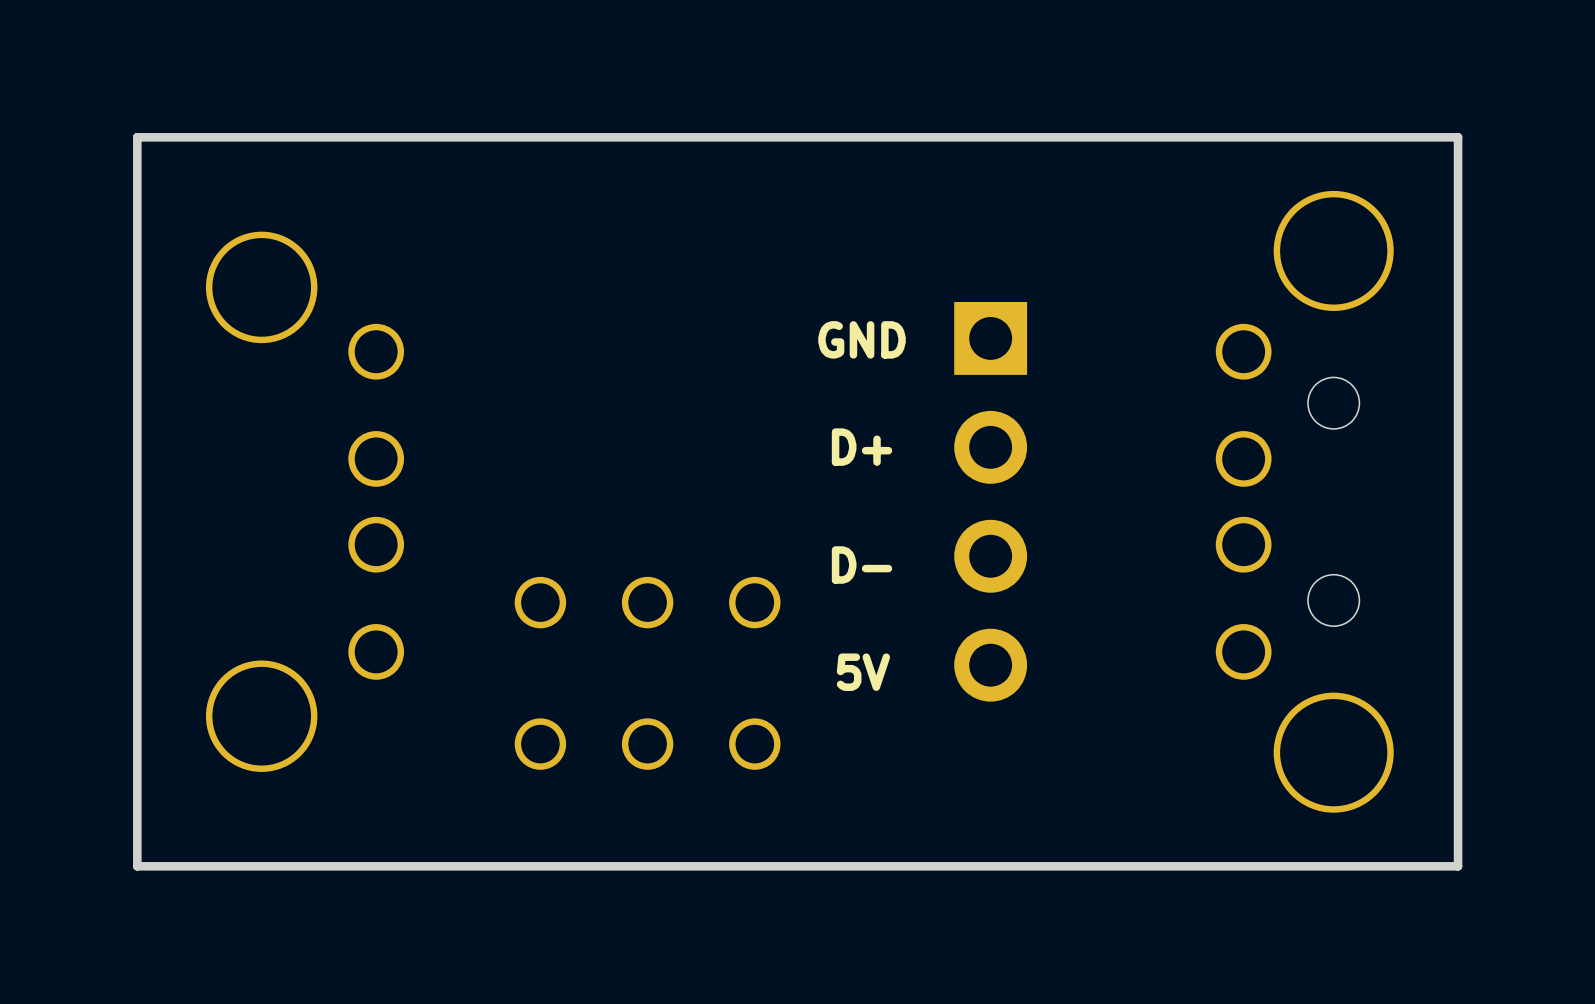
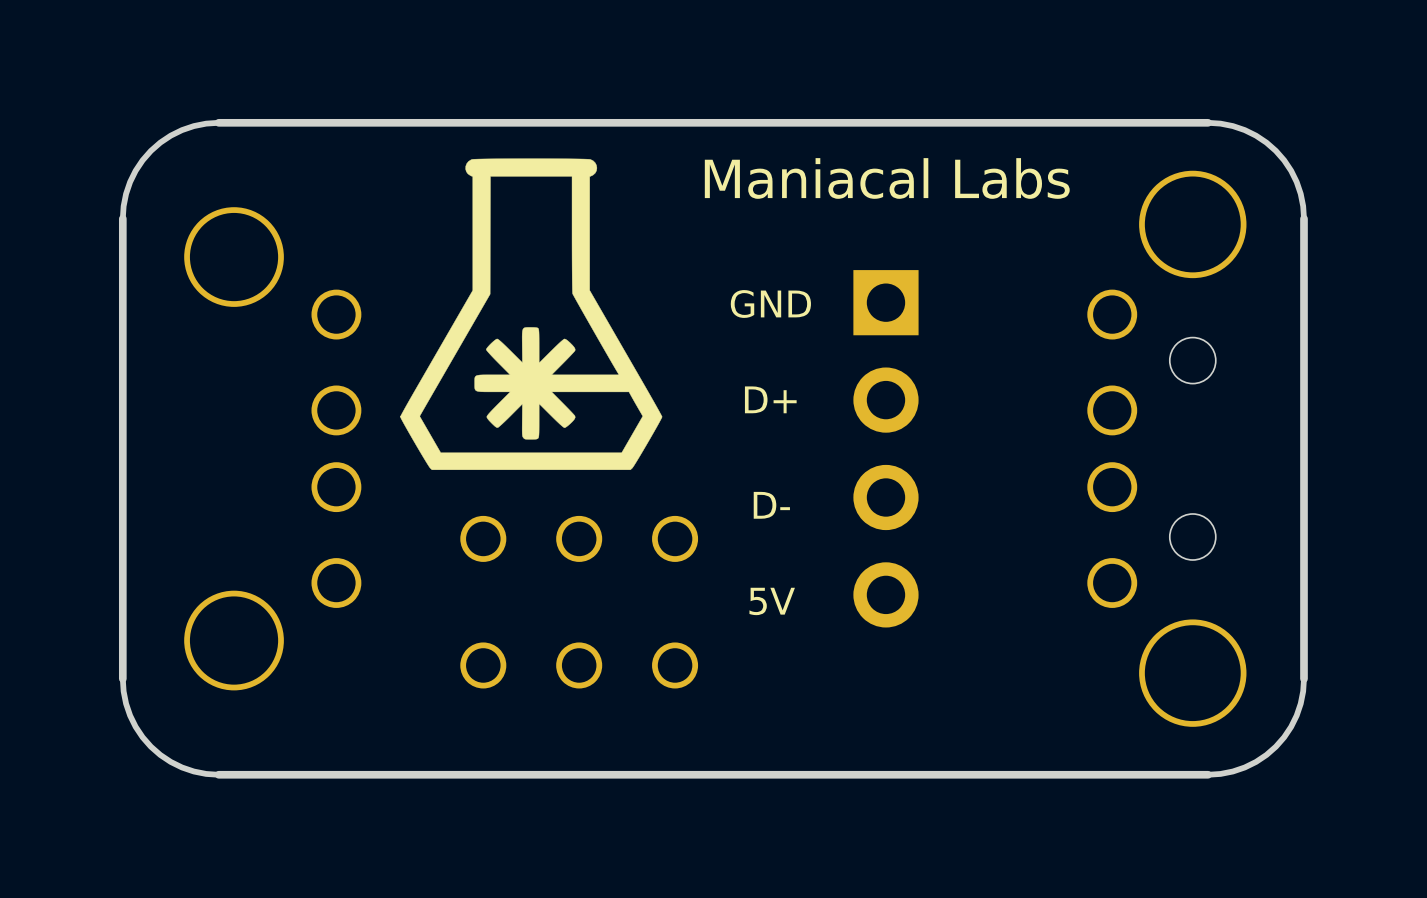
board edge: (244, 137) (137, 137) (137, 244) -> (218, 122) (206, 123) (182, 130) (160, 142) (150, 150) (142, 160) (130, 182) (123, 206) (122, 218)
board edge: (1350, 137) (1458, 137) (1458, 244) -> (1208, 122) (1220, 123) (1244, 130) (1266, 142) (1275, 150) (1284, 160) (1296, 182) (1303, 206) (1303, 218)
drawing: none -> [400, 158, 663, 471]
text: none -> Maniacal Labs (887, 178)
board edge: (137, 759) (137, 866) (244, 866) -> (122, 678) (123, 691) (130, 715) (142, 737) (150, 746) (160, 754) (182, 767) (206, 773) (218, 774)
board edge: (1458, 759) (1458, 866) (1350, 866) -> (1303, 678) (1303, 691) (1296, 715) (1284, 737) (1275, 746) (1266, 754) (1244, 767) (1220, 773) (1208, 774)

